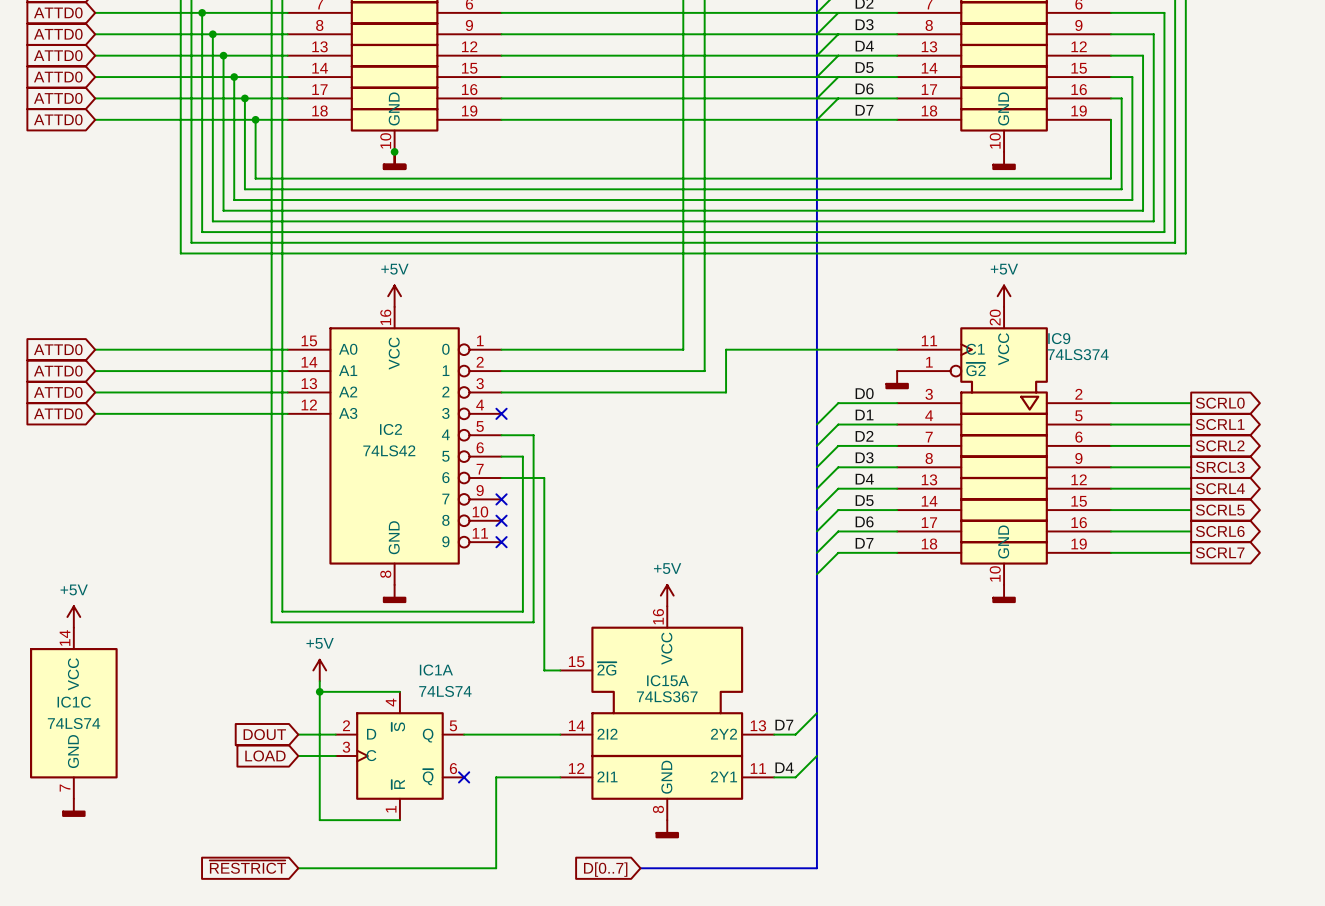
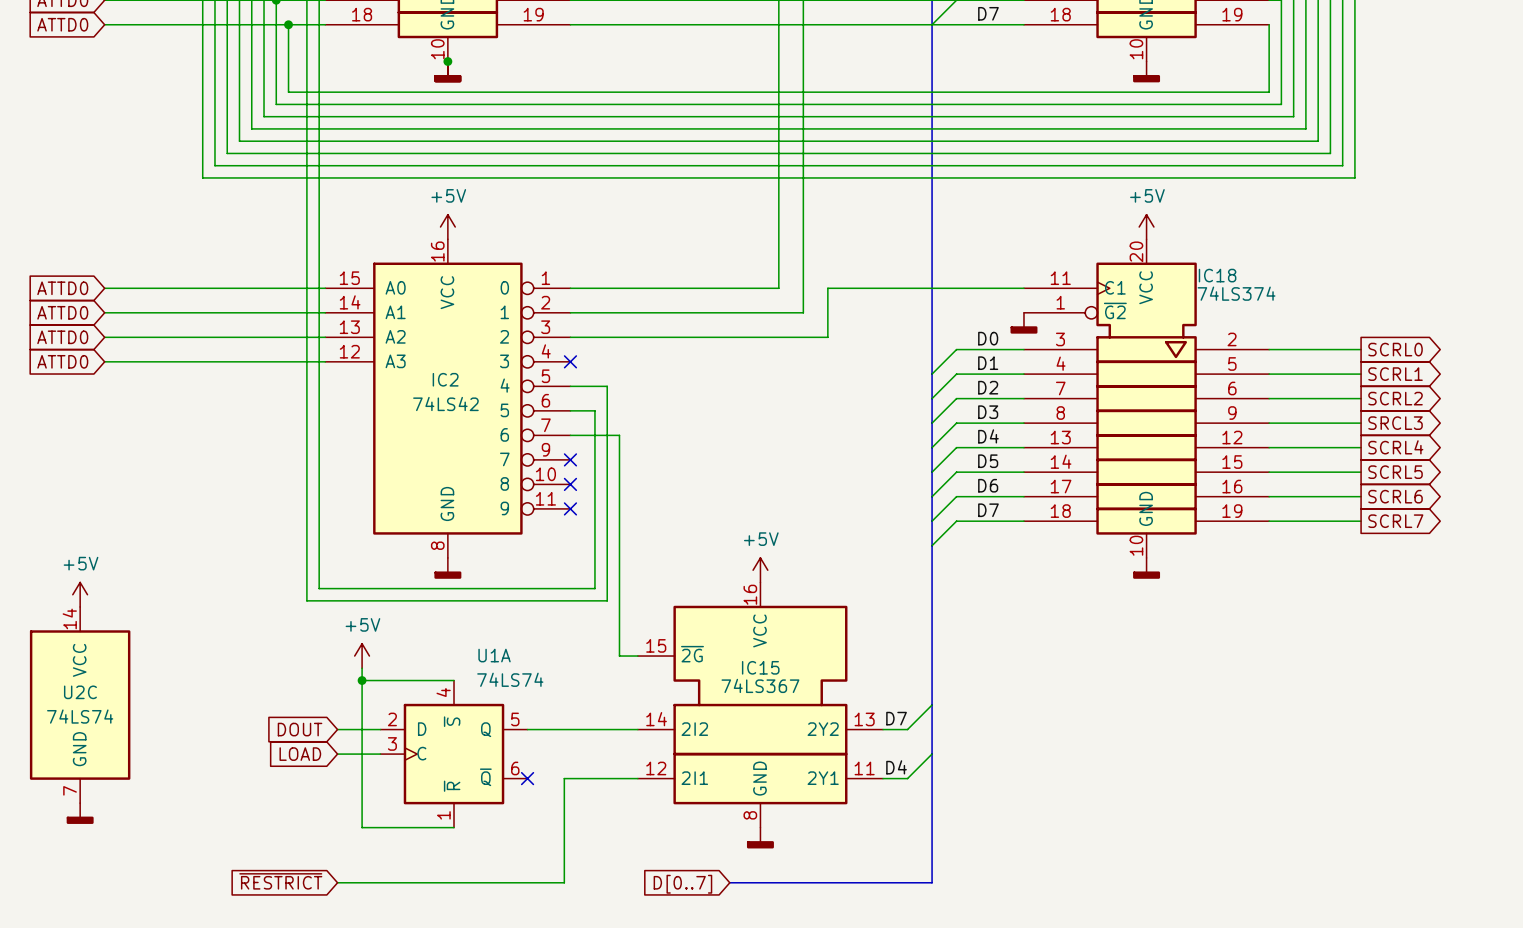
IC9 name: IC9 (1059, 338) -> IC18 (1217, 275)
IC1A name: IC1A (436, 670) -> U1A (494, 655)
IC15A name: IC15A (667, 680) -> IC15 (760, 667)
IC1C name: IC1C (74, 702) -> U2C (80, 692)

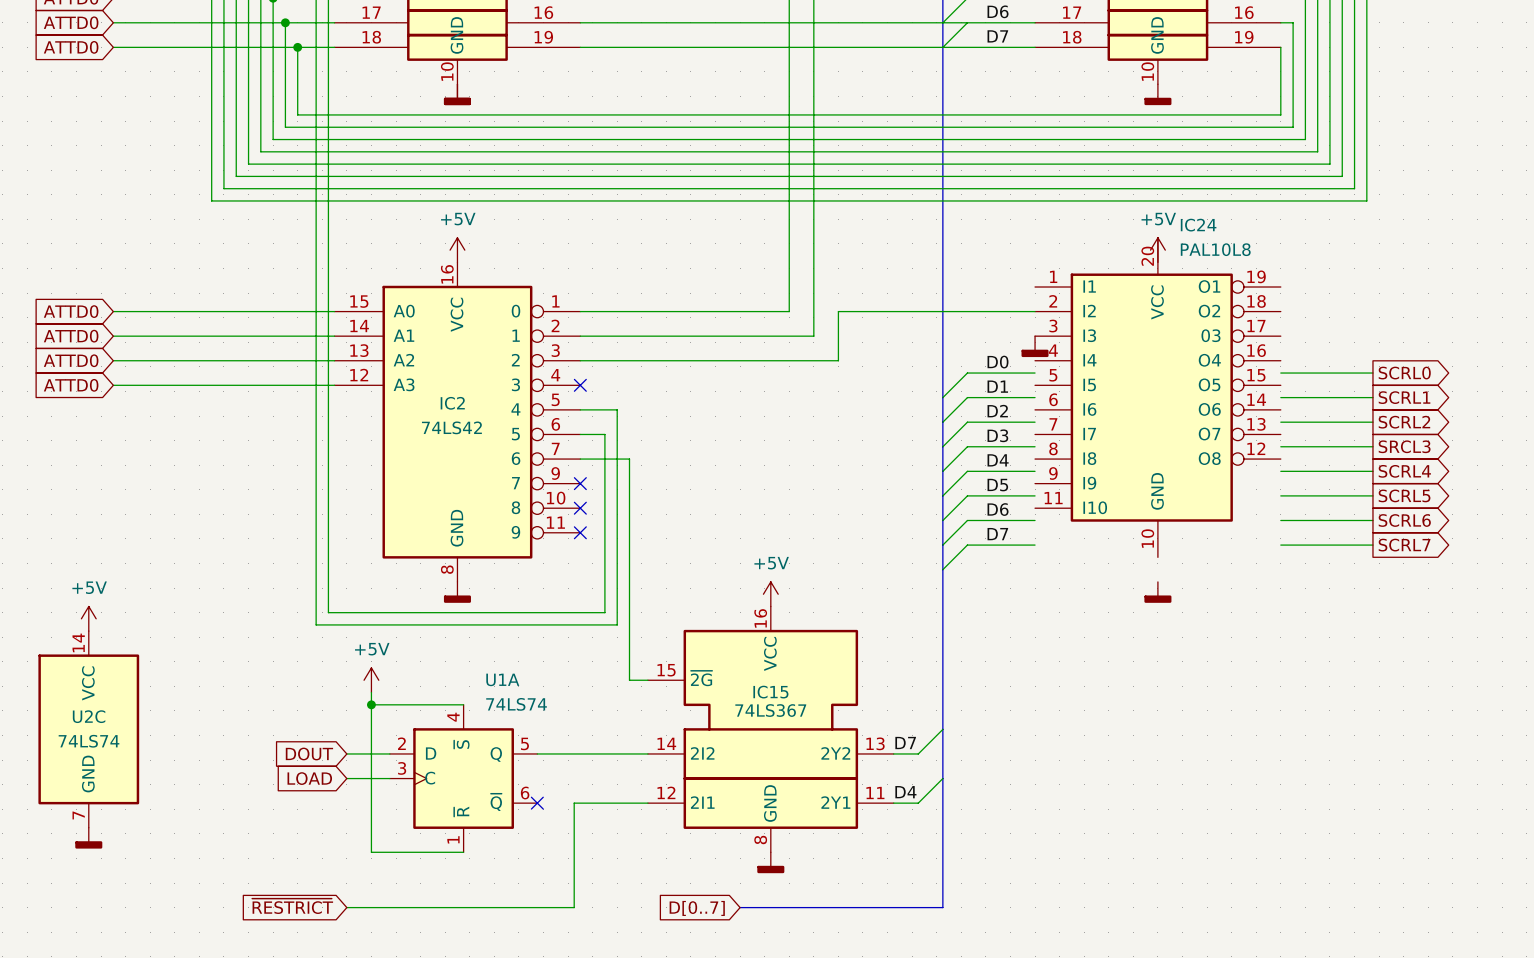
junction: (447, 61) -> none
IC24: none -> PAL10L8 (1157, 397)
IC18: 74LS374 (1146, 398) -> none

